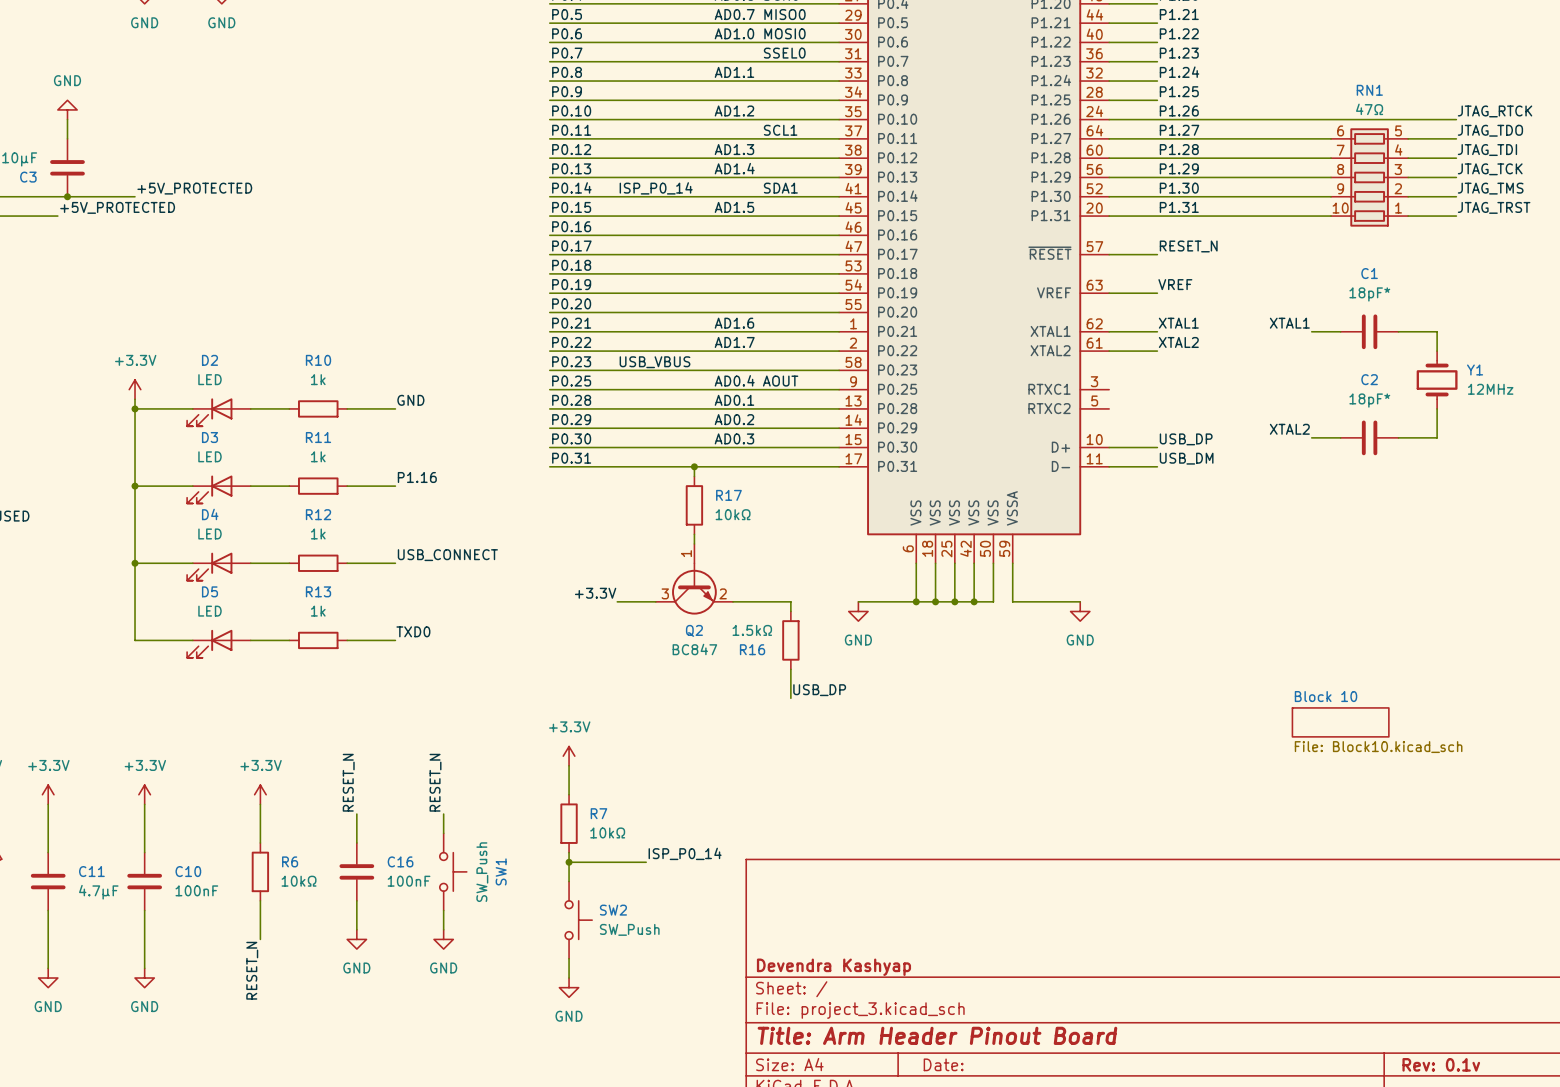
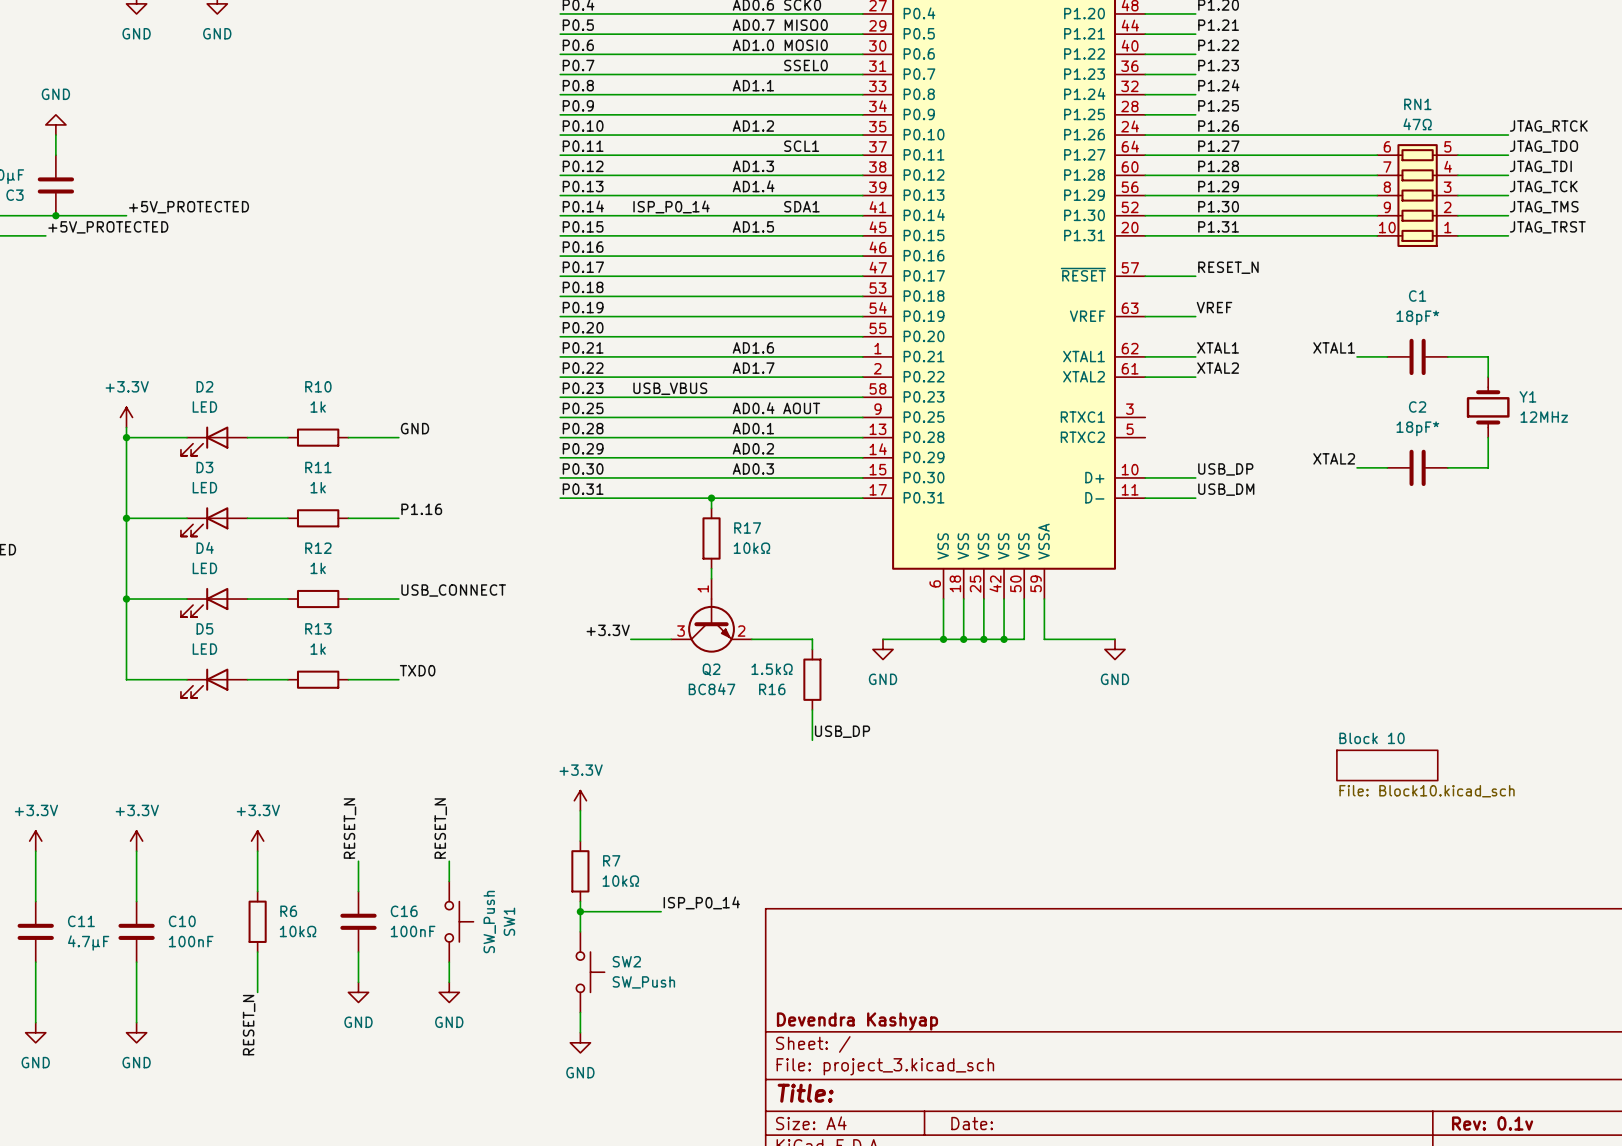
title block: Title: Arm Header Pinout Board (937, 1035) -> Title: (805, 1093)

